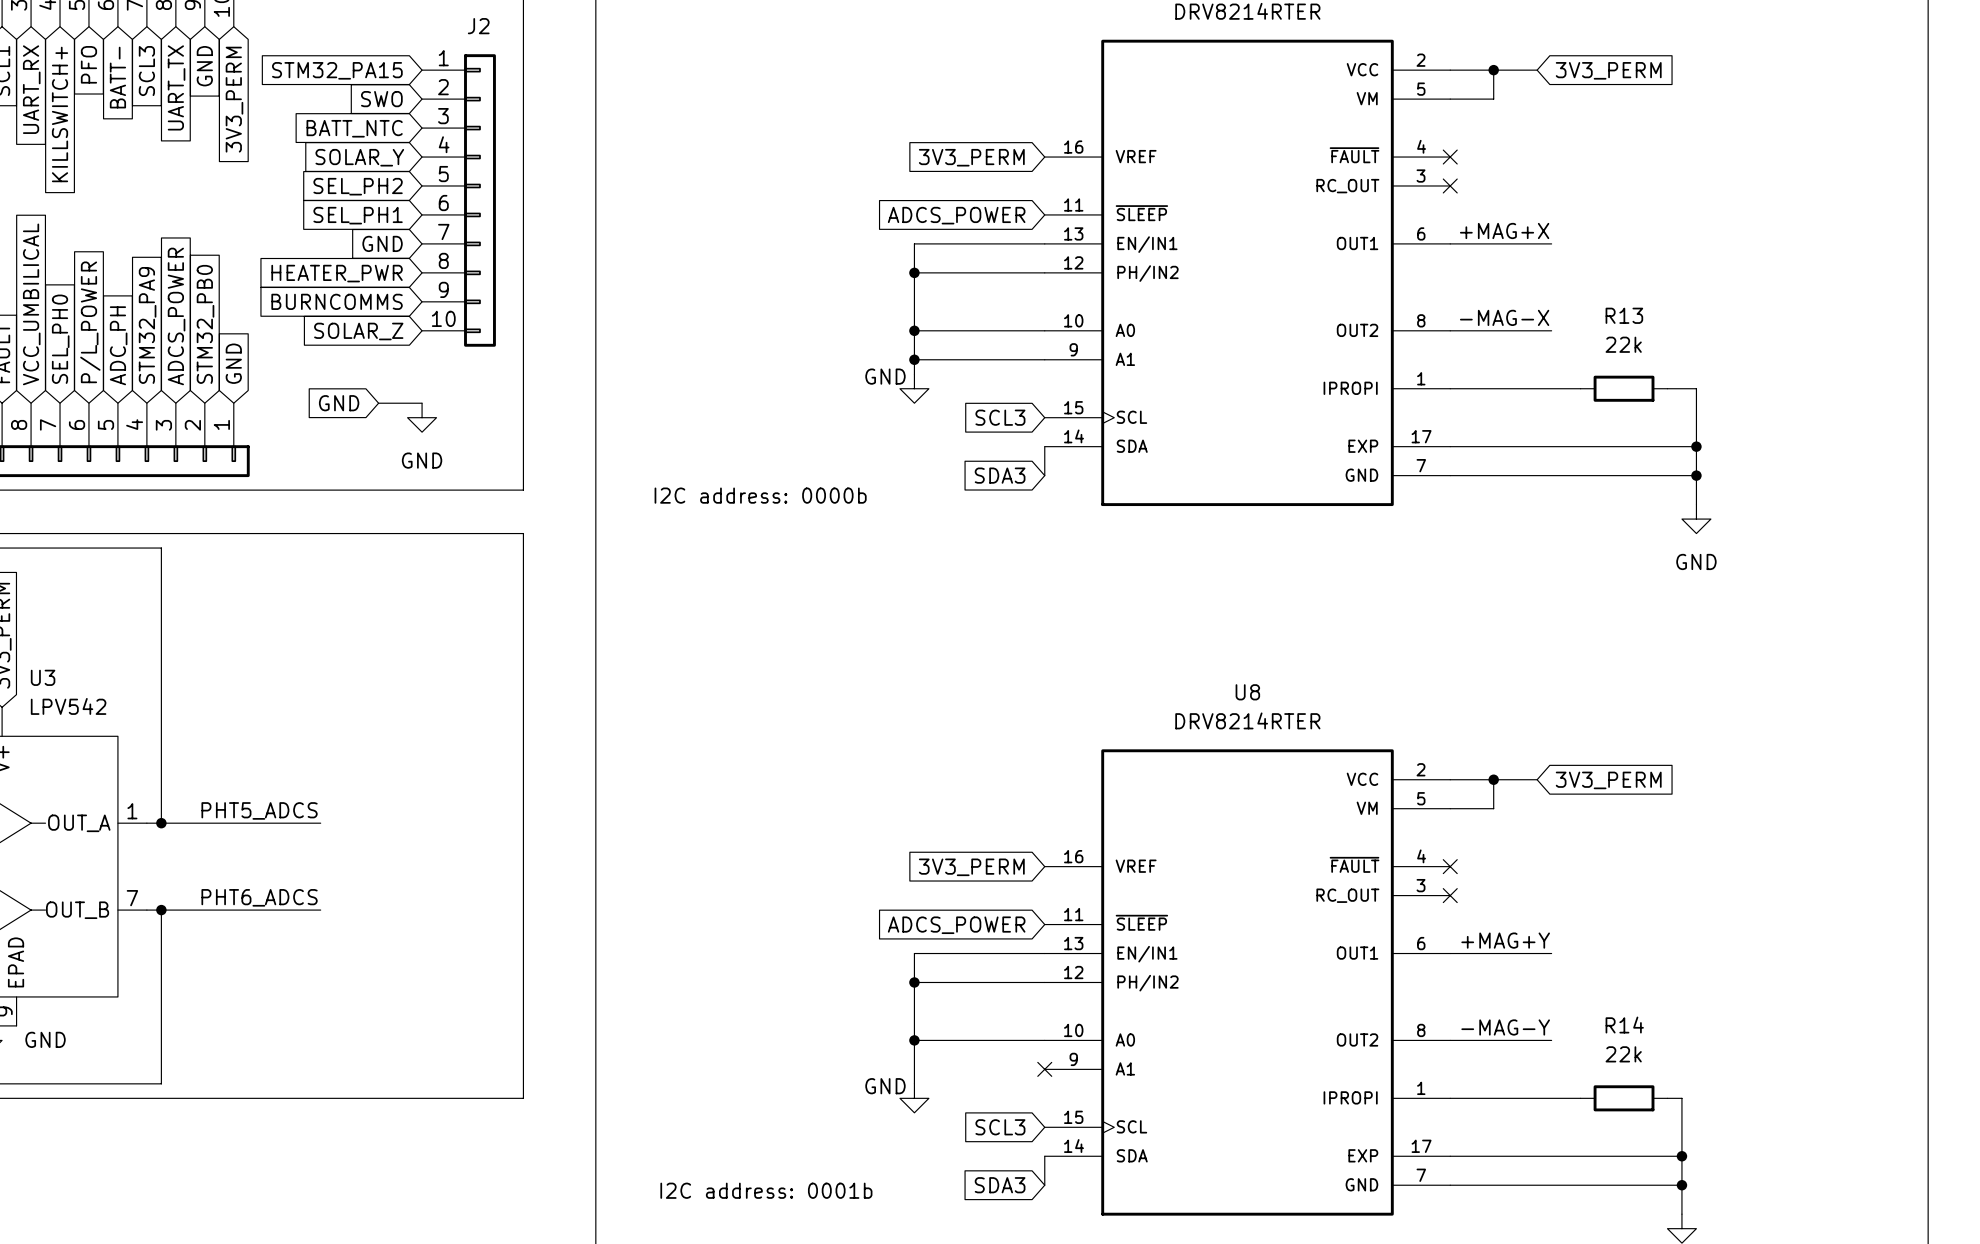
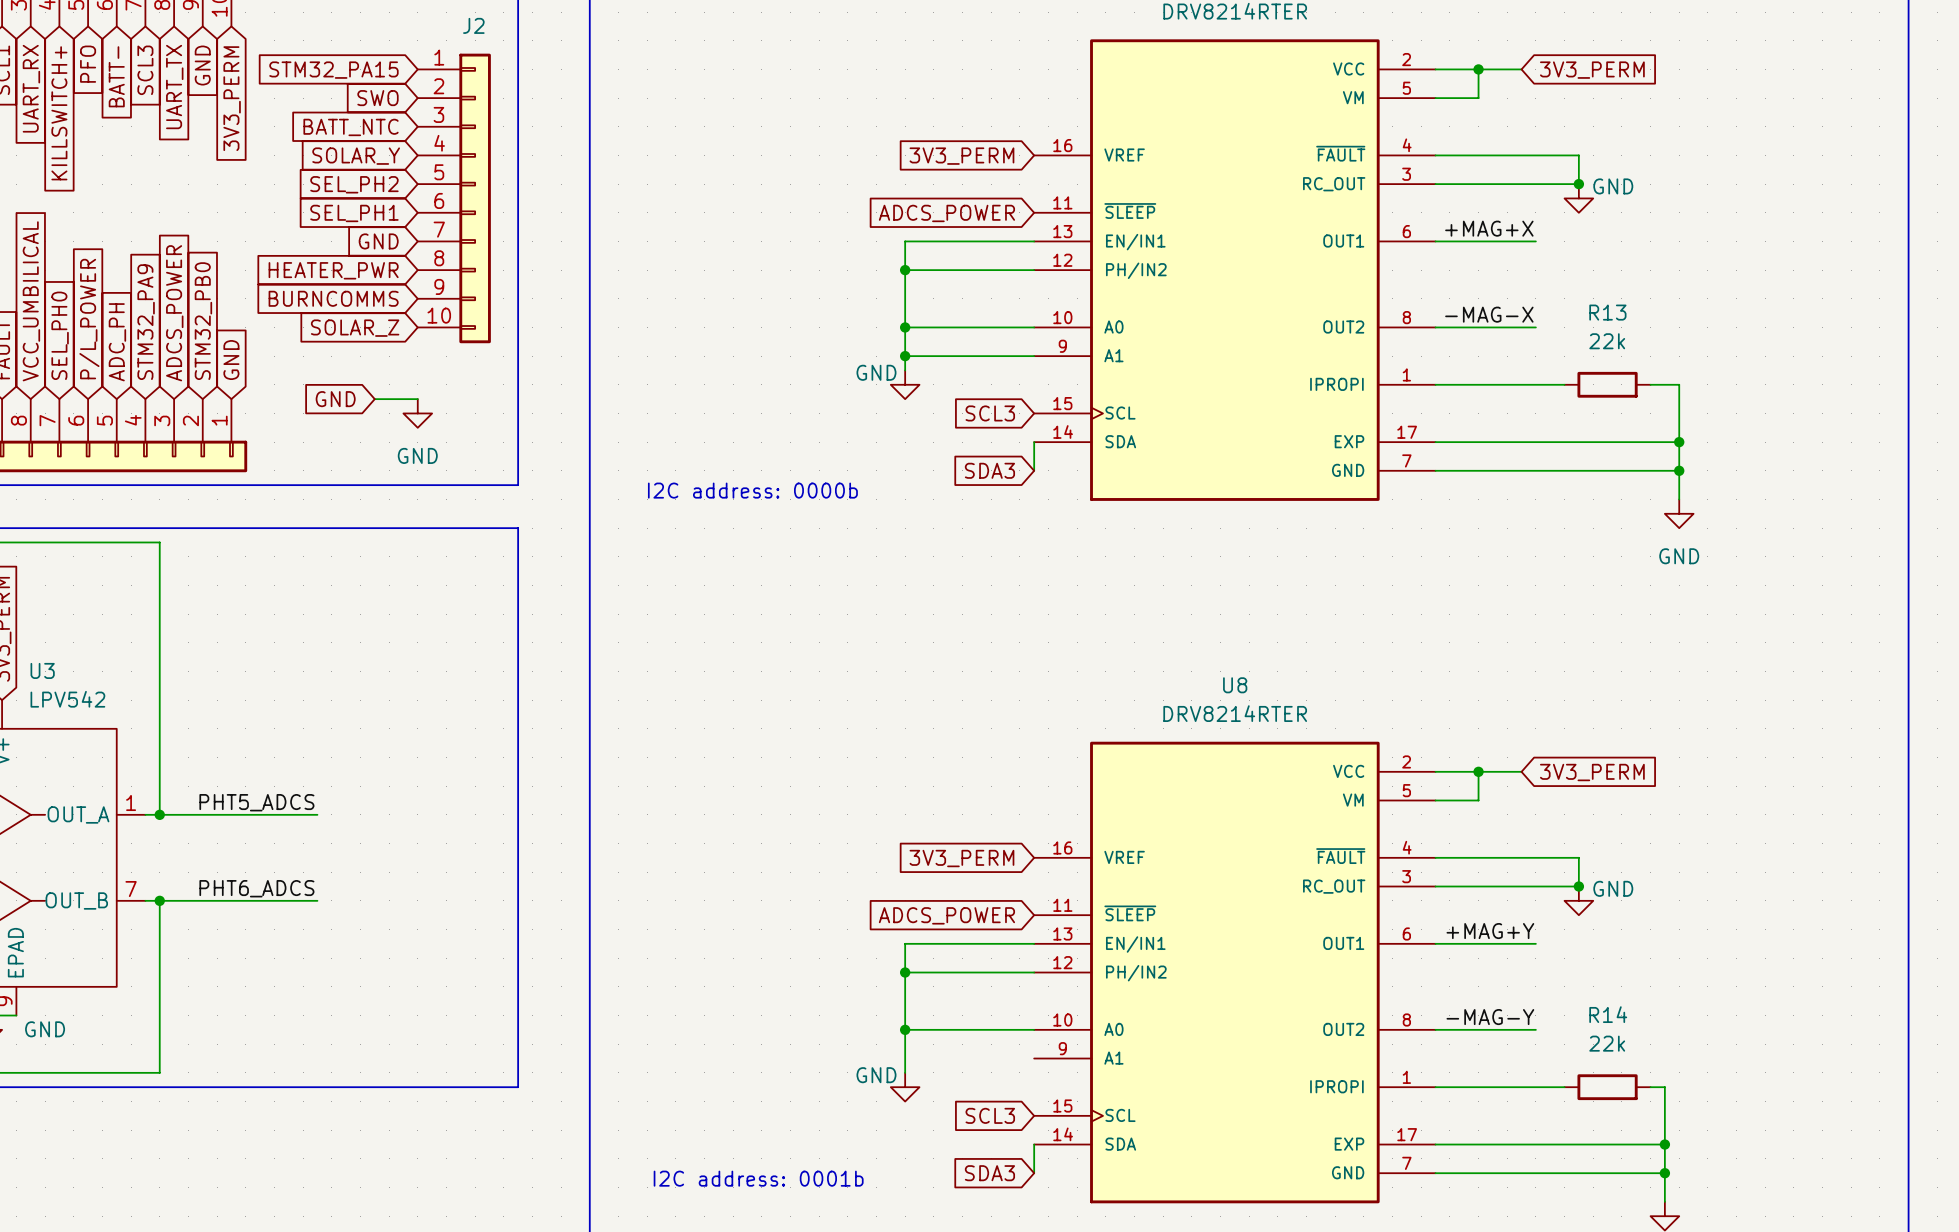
wire: none -> (1435, 155) (1578, 155) (1578, 184) (1435, 184)
no-connect mark: (1450, 157) -> none
no-connect mark: (1450, 185) -> none
junction: none -> (1578, 184)
power symbol: none -> GND (1578, 198)
wire: none -> (1435, 857) (1578, 857) (1578, 886) (1435, 886)
no-connect mark: (1450, 866) -> none
no-connect mark: (1450, 895) -> none
junction: none -> (1578, 886)
power symbol: none -> GND (1578, 900)
no-connect mark: (1044, 1069) -> none

